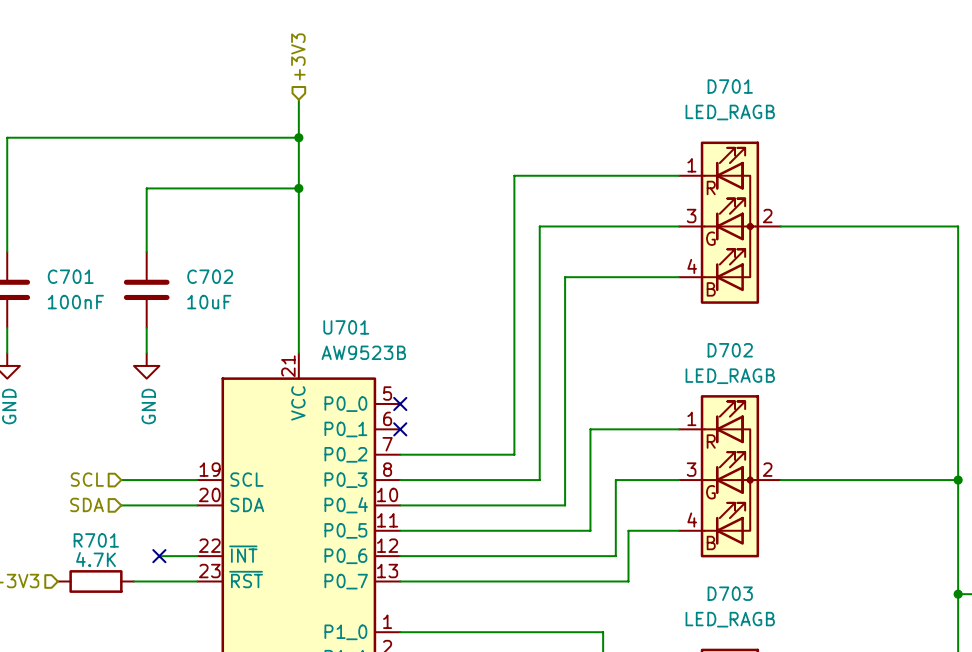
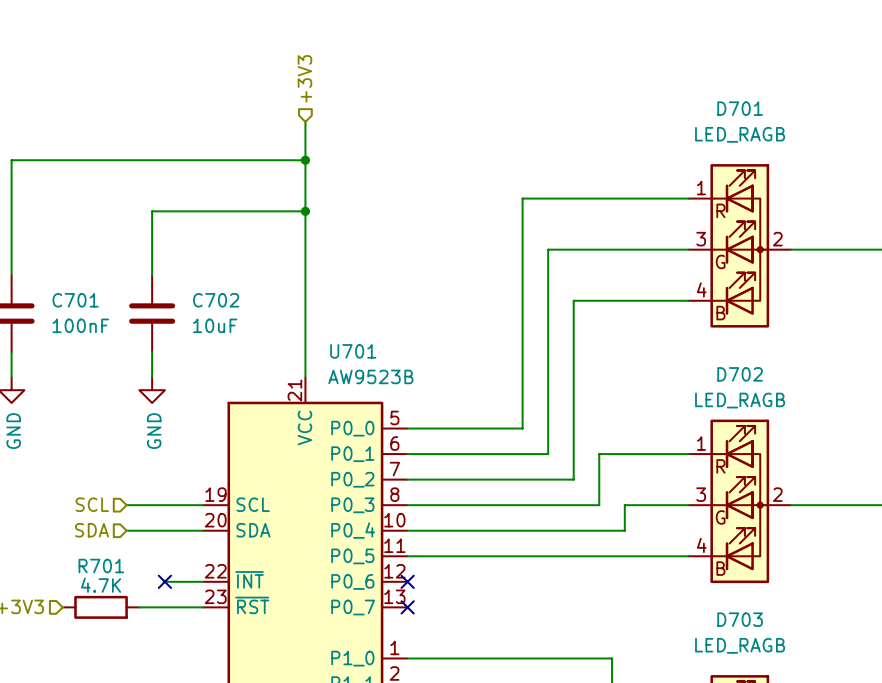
wire: none -> (407, 428) (522, 428)
no-connect mark: (400, 403) -> none
wire: (514, 403) (514, 454) -> (573, 479) (522, 479)
wire: none -> (407, 454) (548, 454)
no-connect mark: (400, 429) -> none
wire: (539, 429) (539, 480) -> (599, 505) (548, 505)
wire: (565, 454) (565, 505) -> (624, 530) (573, 530)
wire: (590, 480) (590, 530) -> (637, 556) (599, 556)
wire: (615, 505) (615, 556) (400, 556) -> none
wire: (628, 530) (628, 581) (400, 581) -> none
no-connect mark: none -> (407, 581)
no-connect mark: none -> (407, 607)

